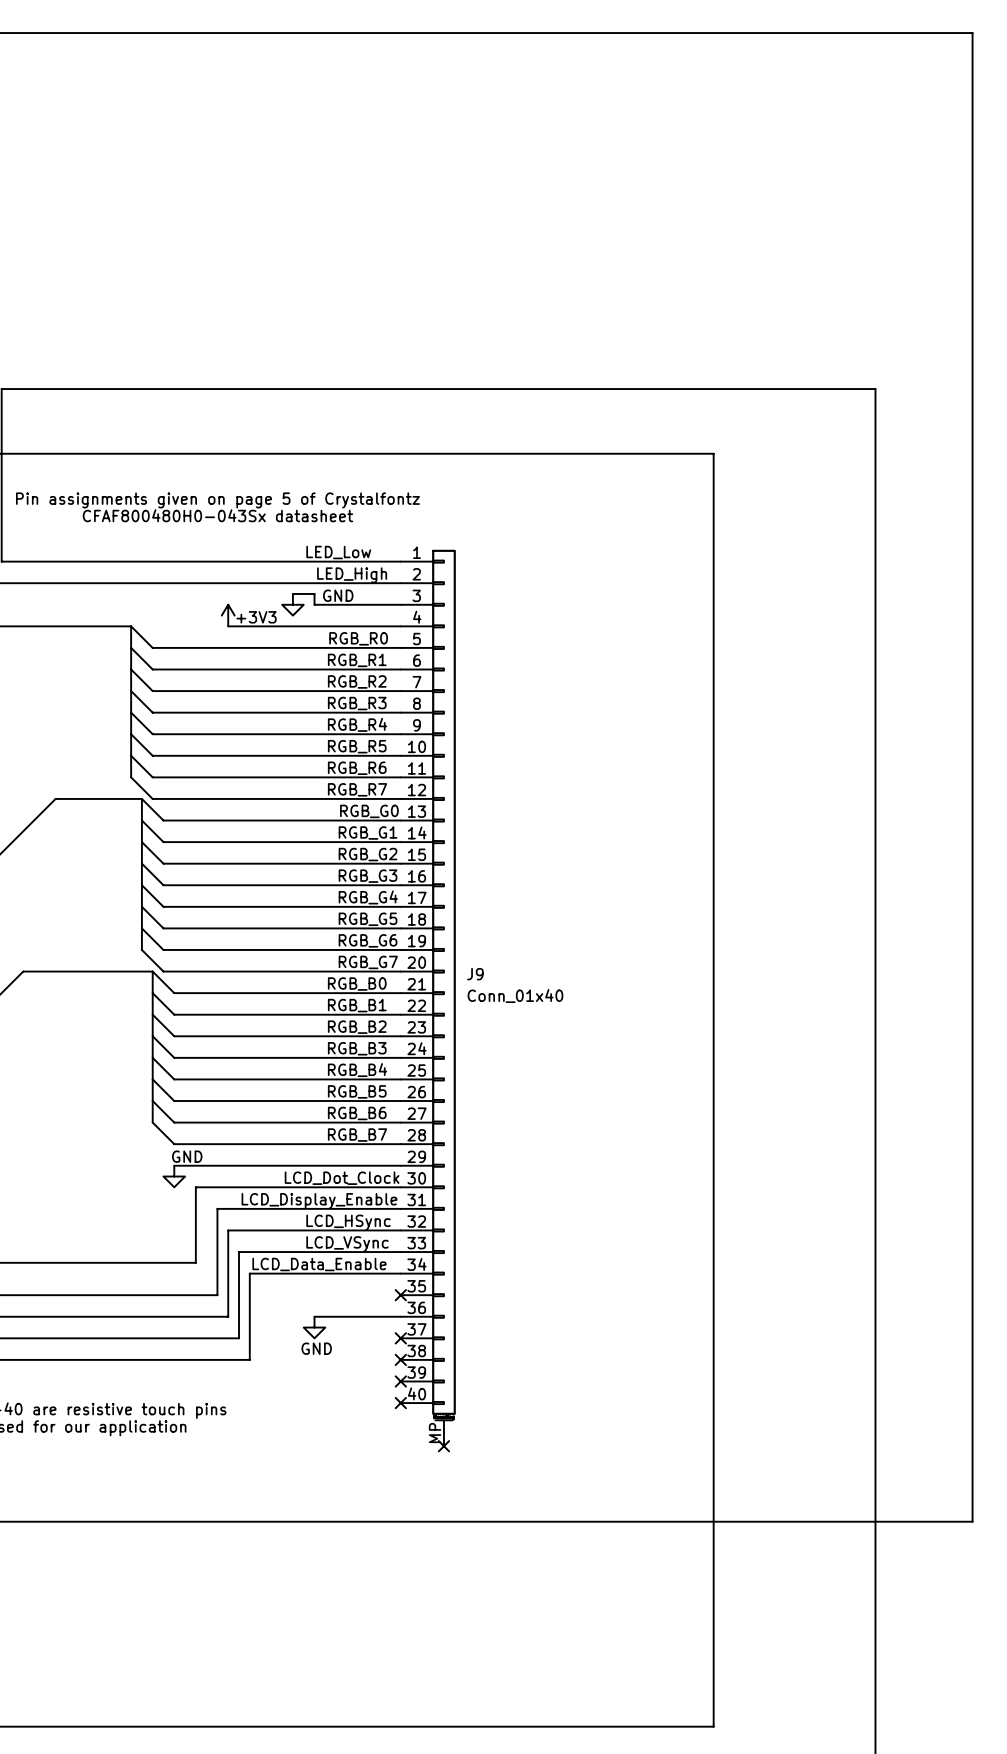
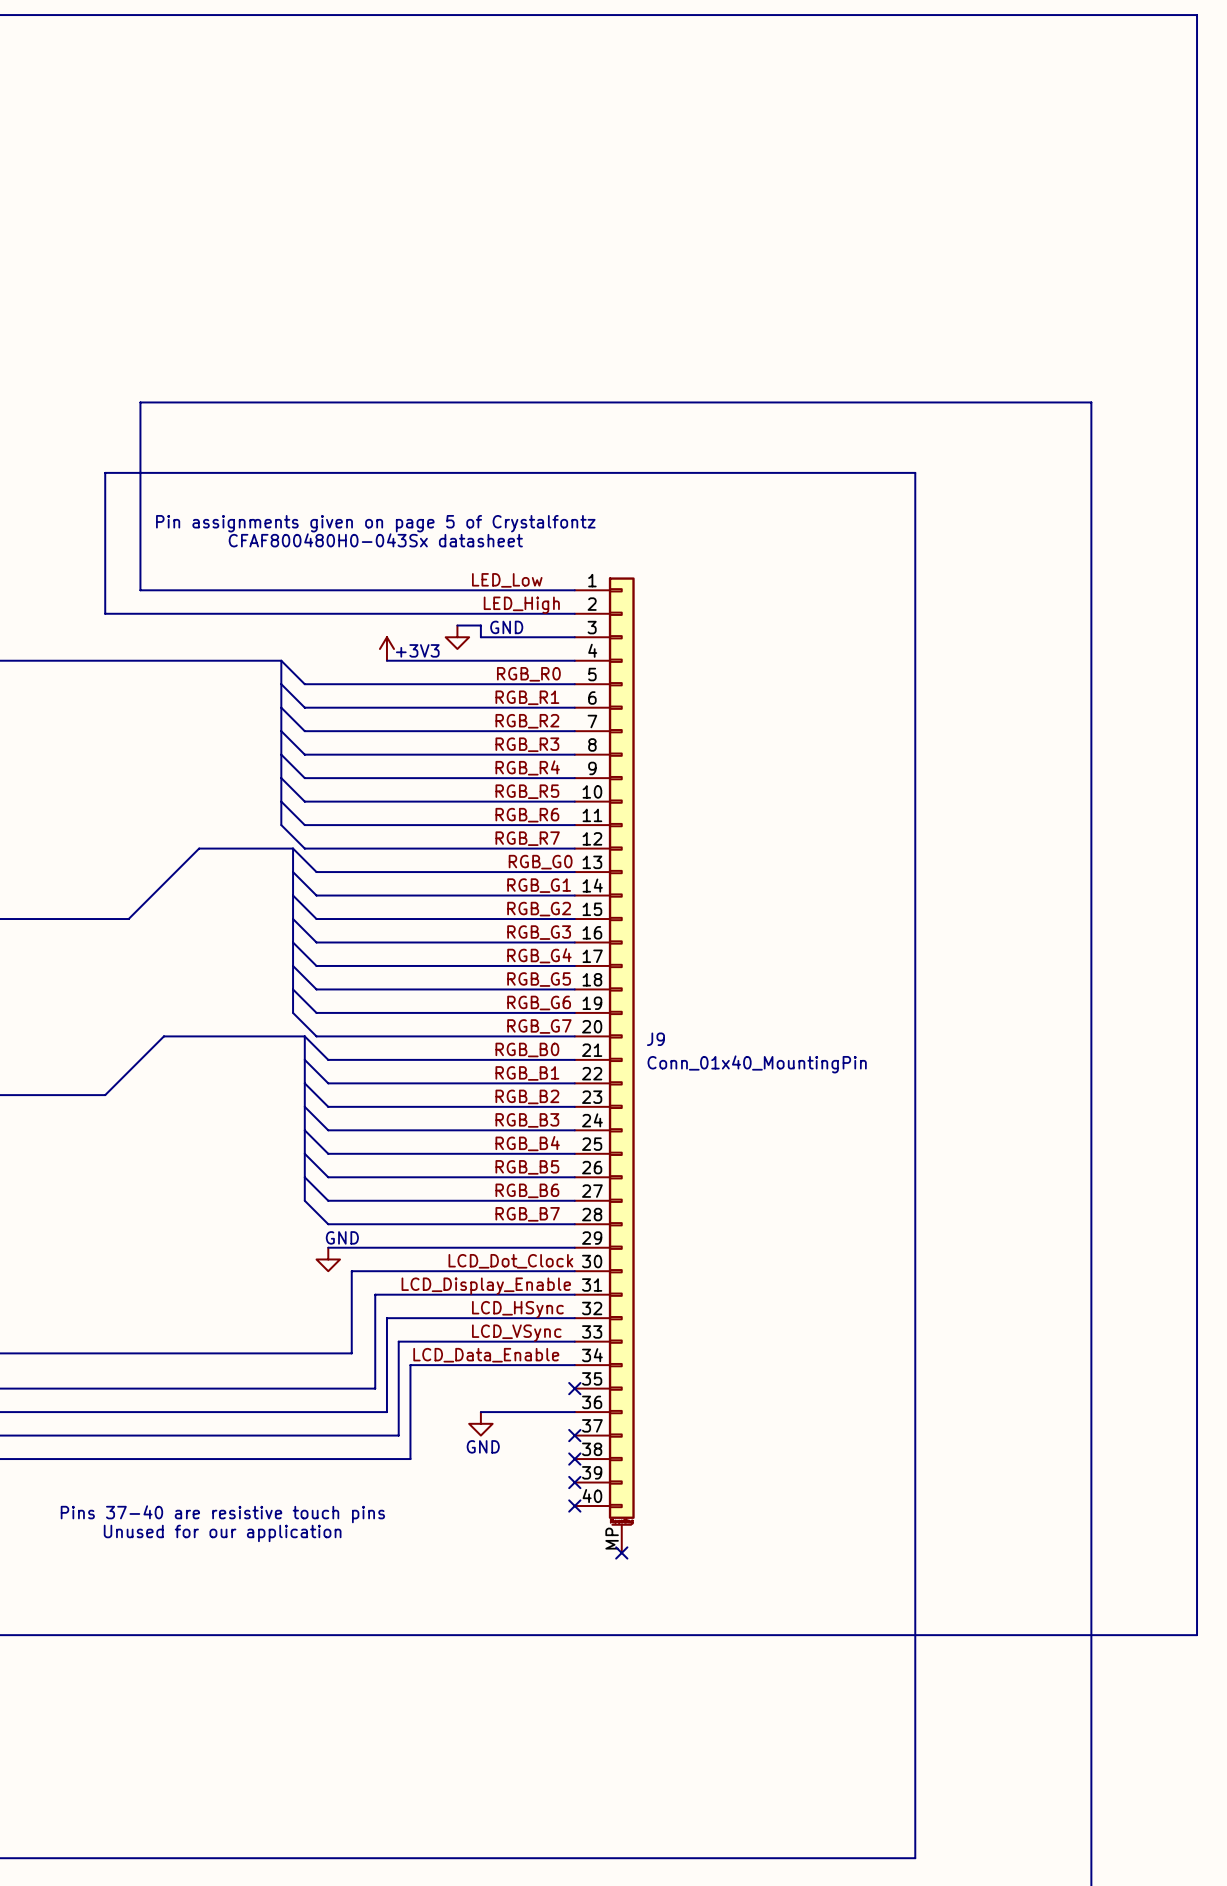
J9 value: Conn_01x40 (515, 996) -> Conn_01x40_MountingPin (757, 1064)

